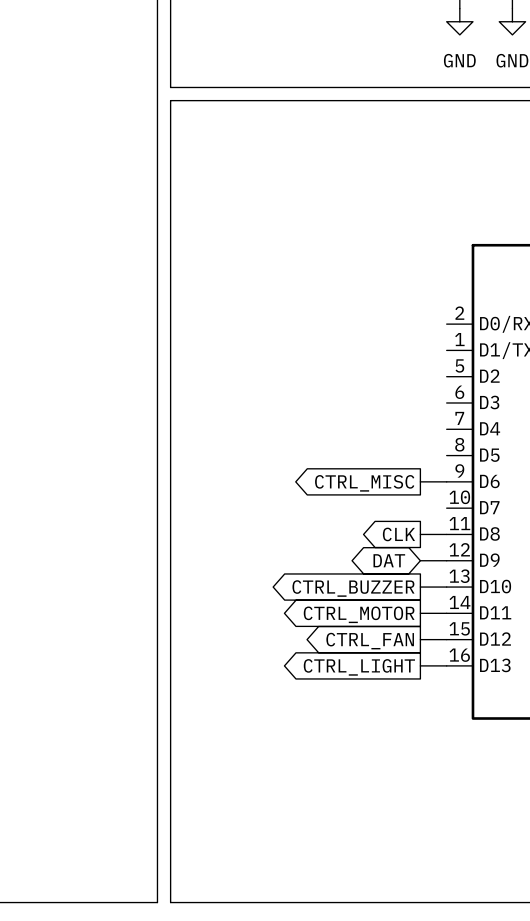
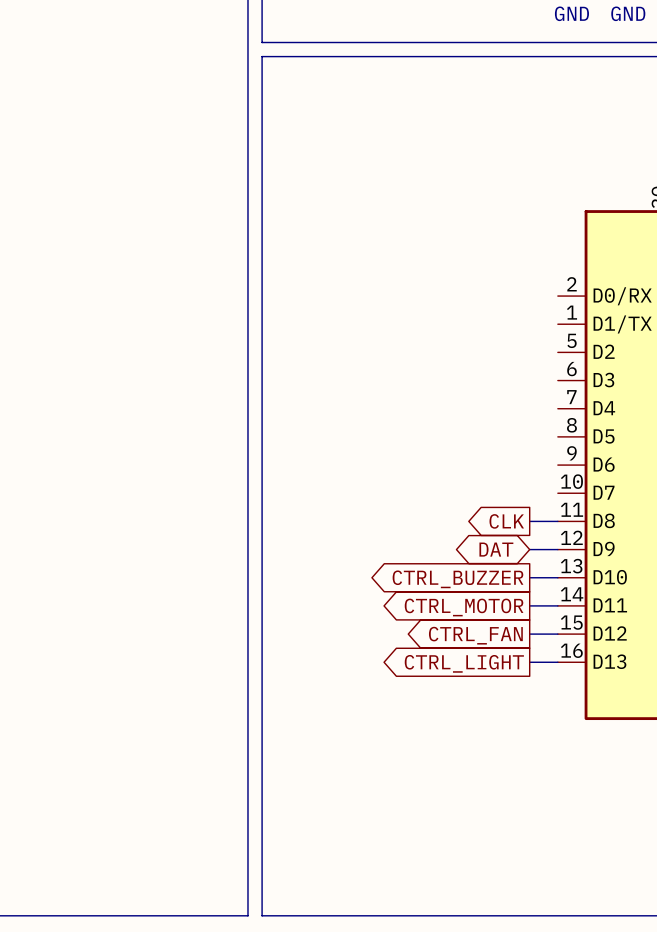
wire: (420, 481) (446, 481) -> none
global label: CTRL_MISC (364, 483) -> none

